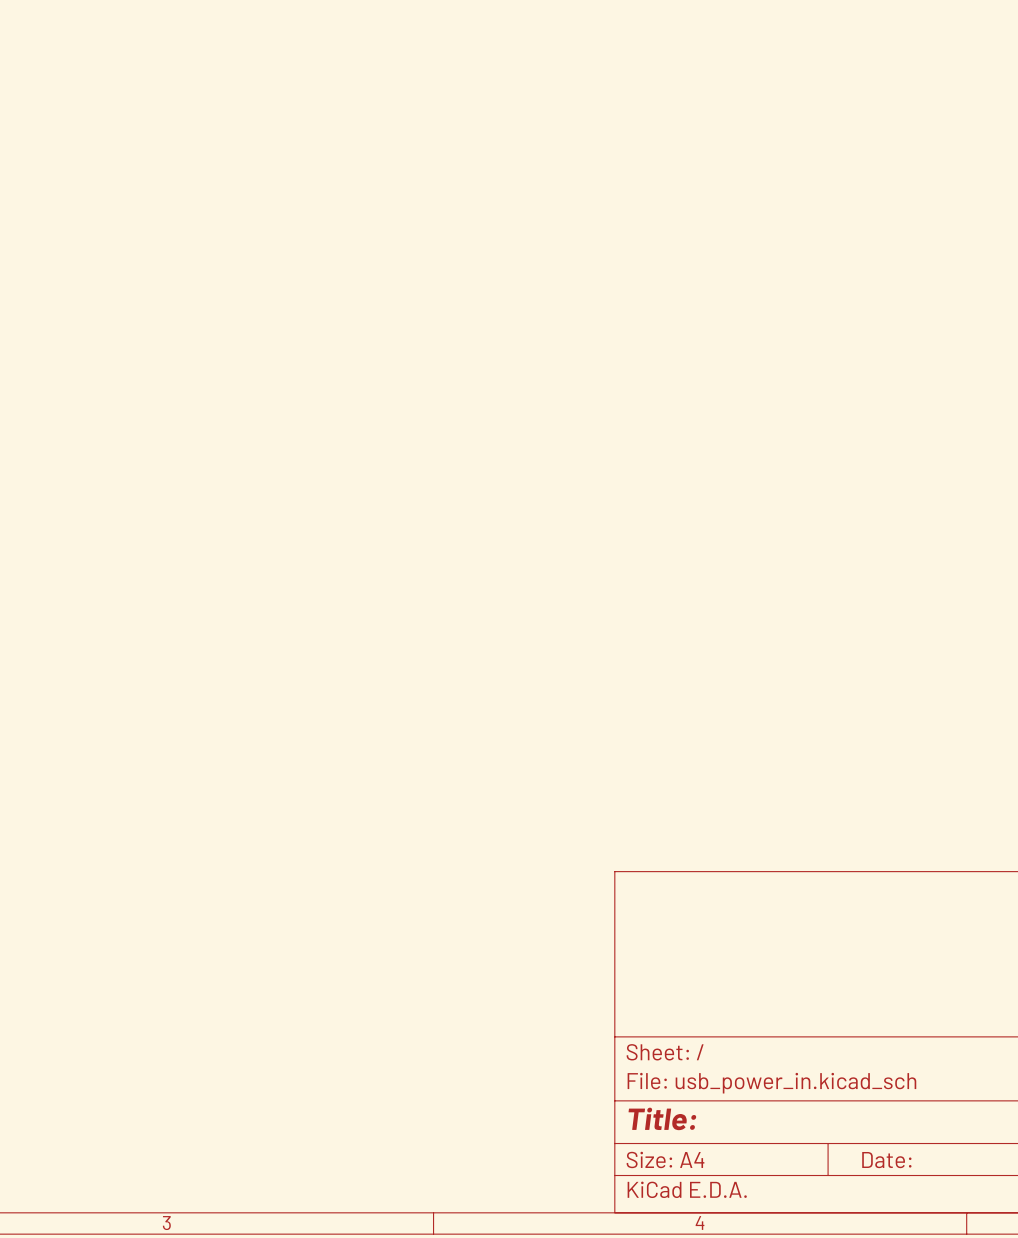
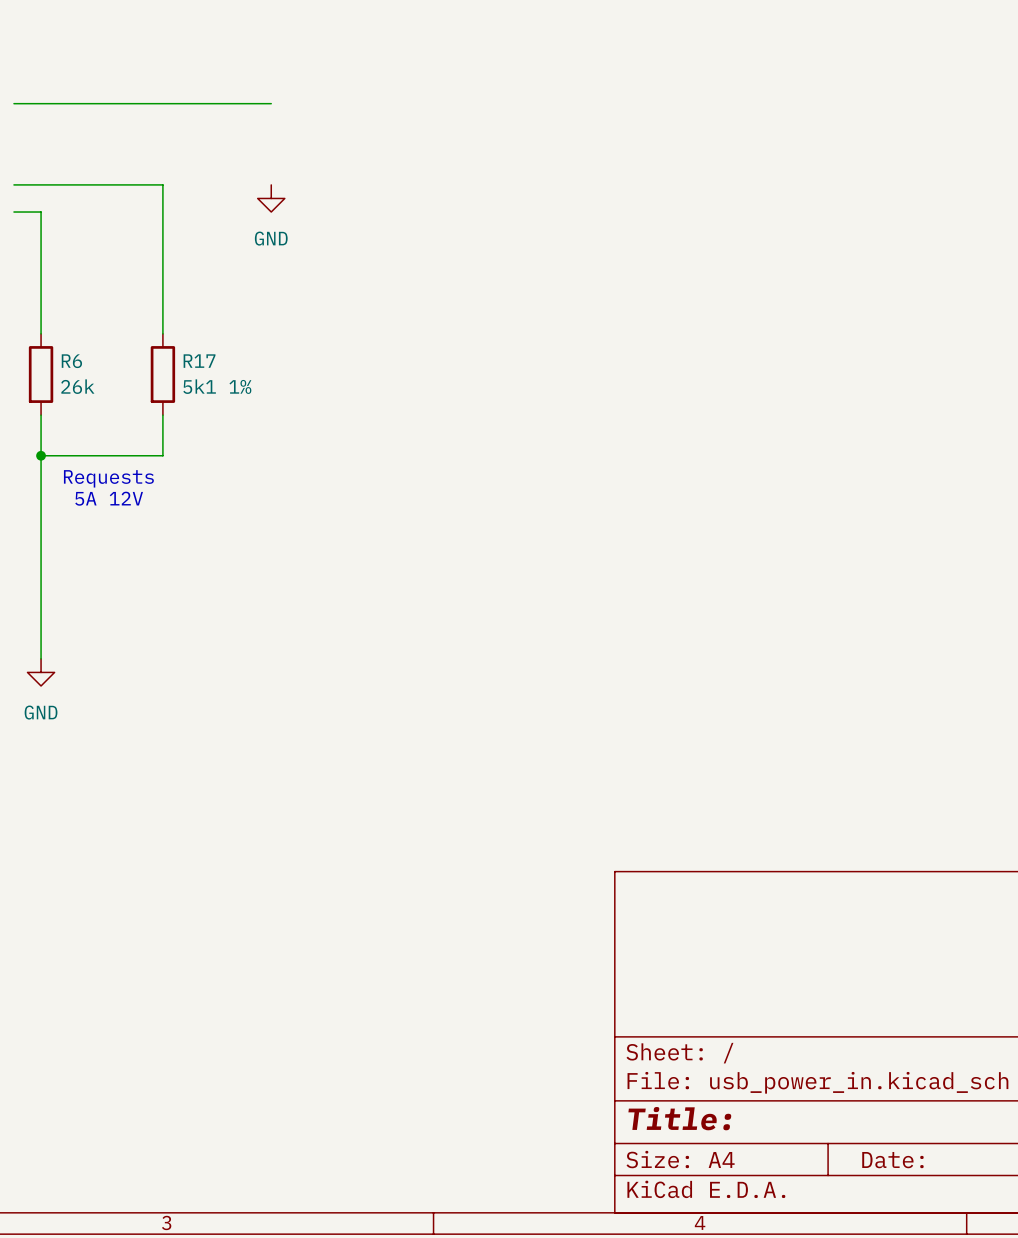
wire: none -> (13, 103) (271, 103)
wire: none -> (13, 184) (162, 184) (162, 333)
power symbol: none -> GND (271, 198)
wire: none -> (13, 212) (41, 212) (41, 333)
R6: none -> 26k (41, 374)
R17: none -> 5k1 1% (162, 374)
wire: none -> (41, 415) (41, 658)
wire: none -> (162, 415) (162, 455) (41, 455)
junction: none -> (41, 455)
text: none -> Requests (108, 478)
text: none -> 5A 12V (109, 498)
power symbol: none -> GND (41, 672)

